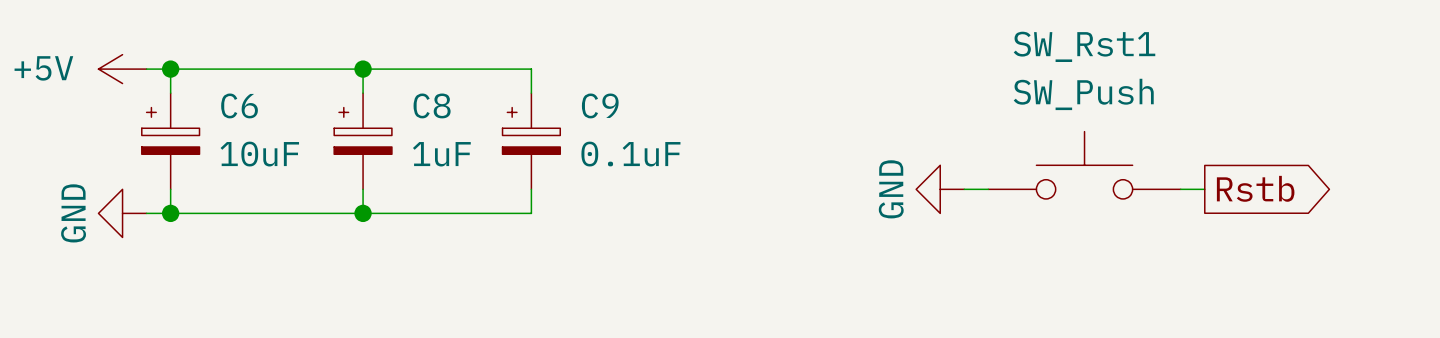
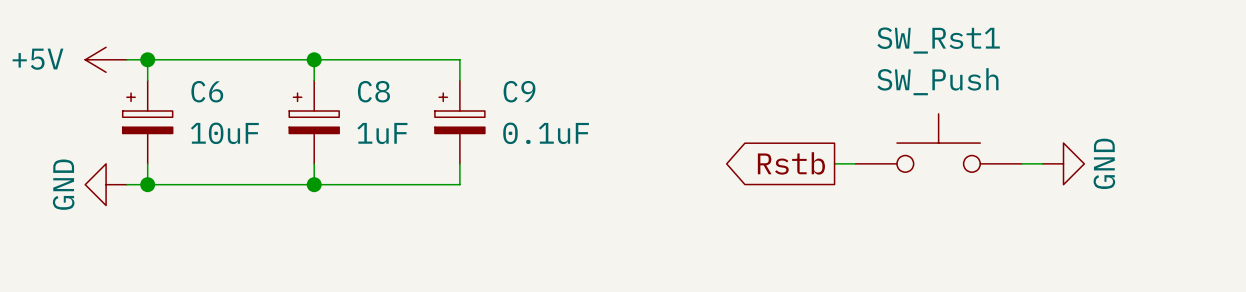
global label rotation: 0° (1255, 188) -> 180° (791, 163)
global label position: Rstb (1255, 188) -> Rstb (791, 163)
power symbol rotation: 0° (940, 189) -> 180° (1063, 163)
power symbol position: GND (940, 189) -> GND (1063, 163)

